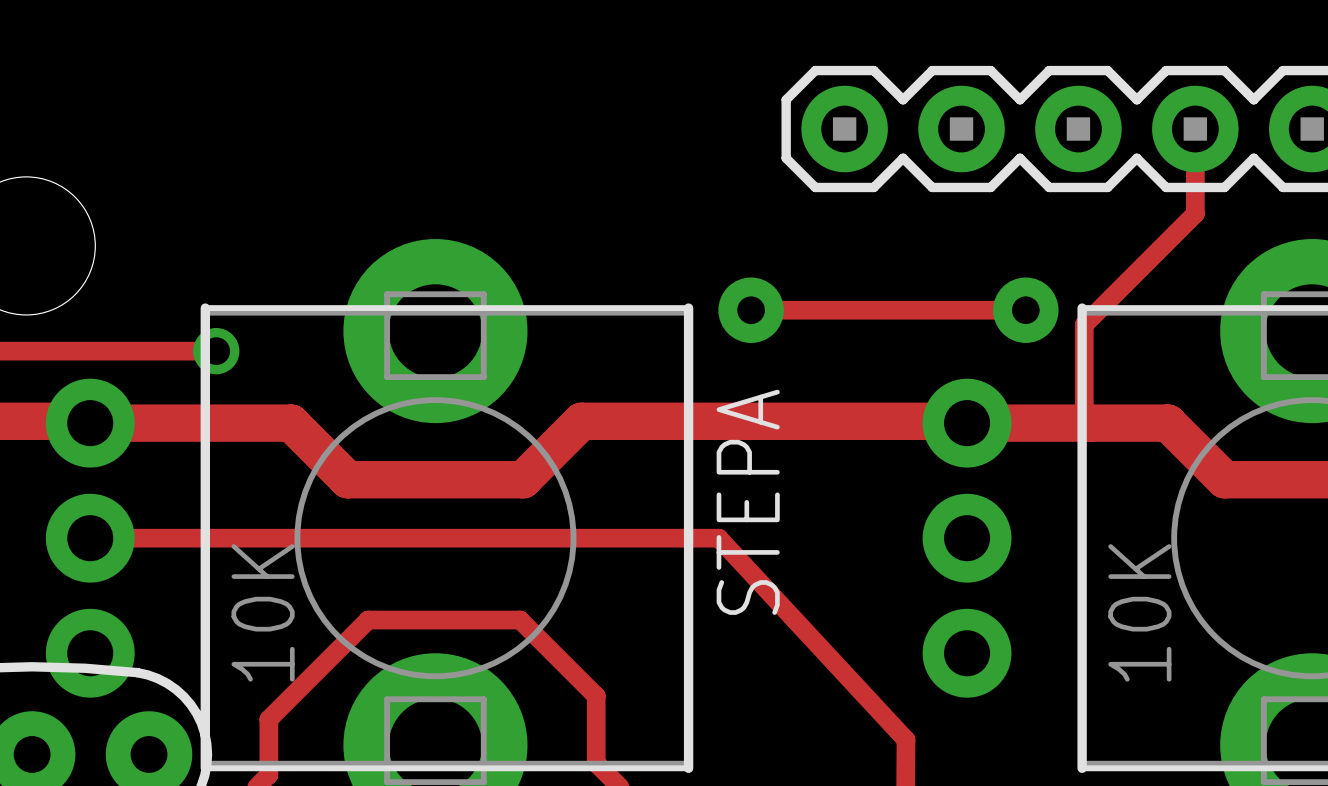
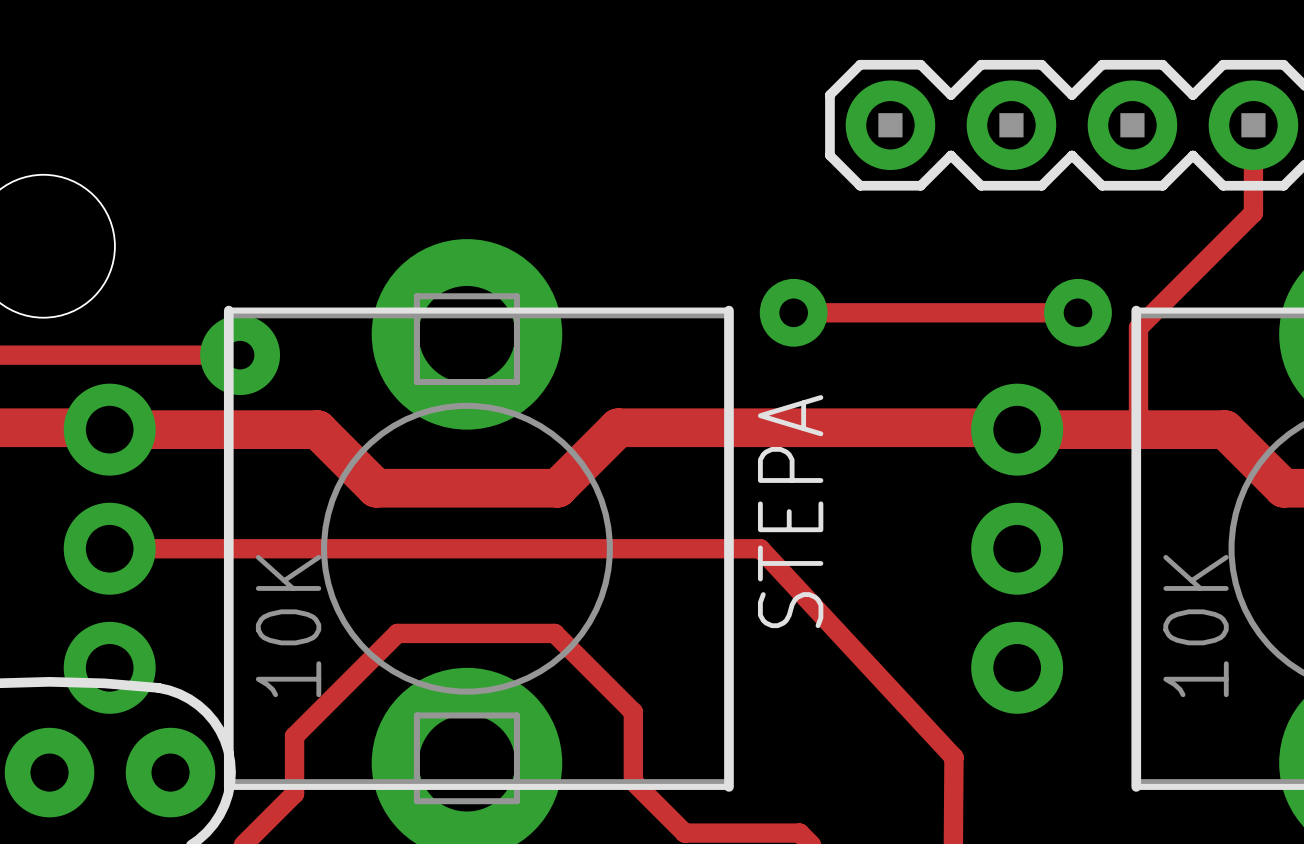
via size: [193, 327, 240, 375] -> [200, 315, 281, 396]

